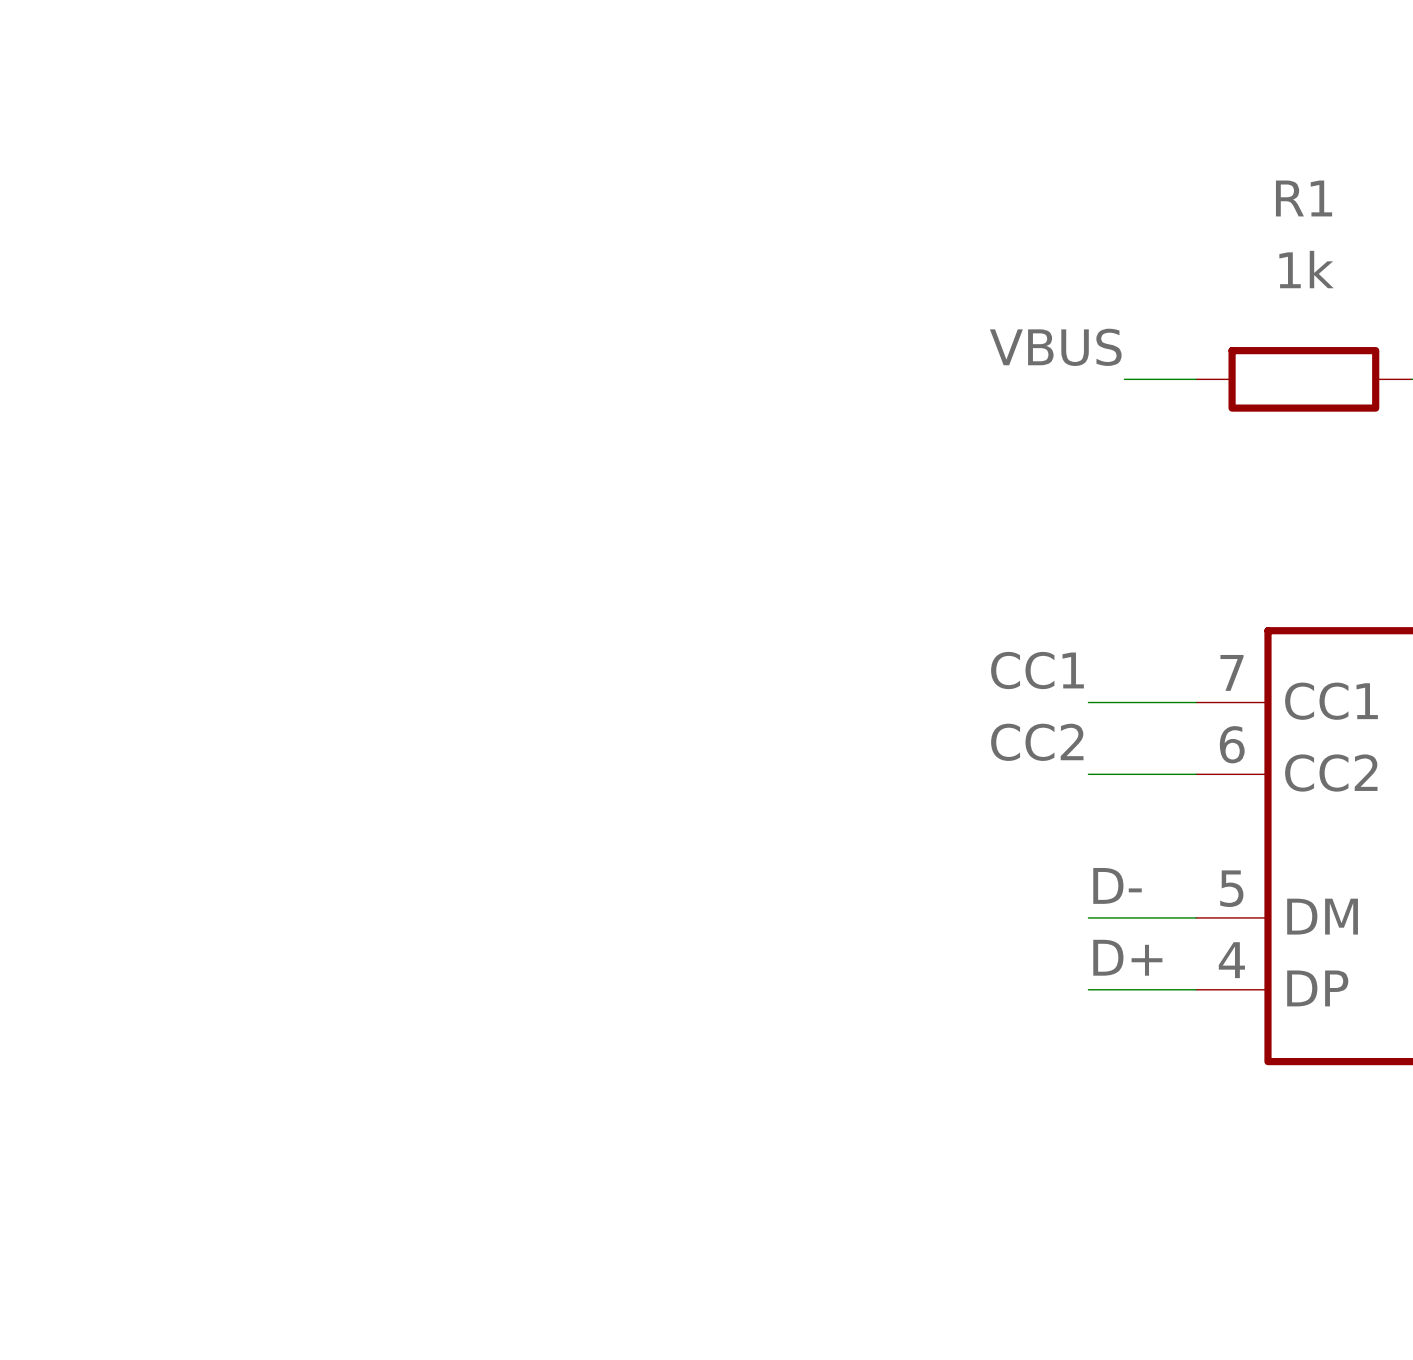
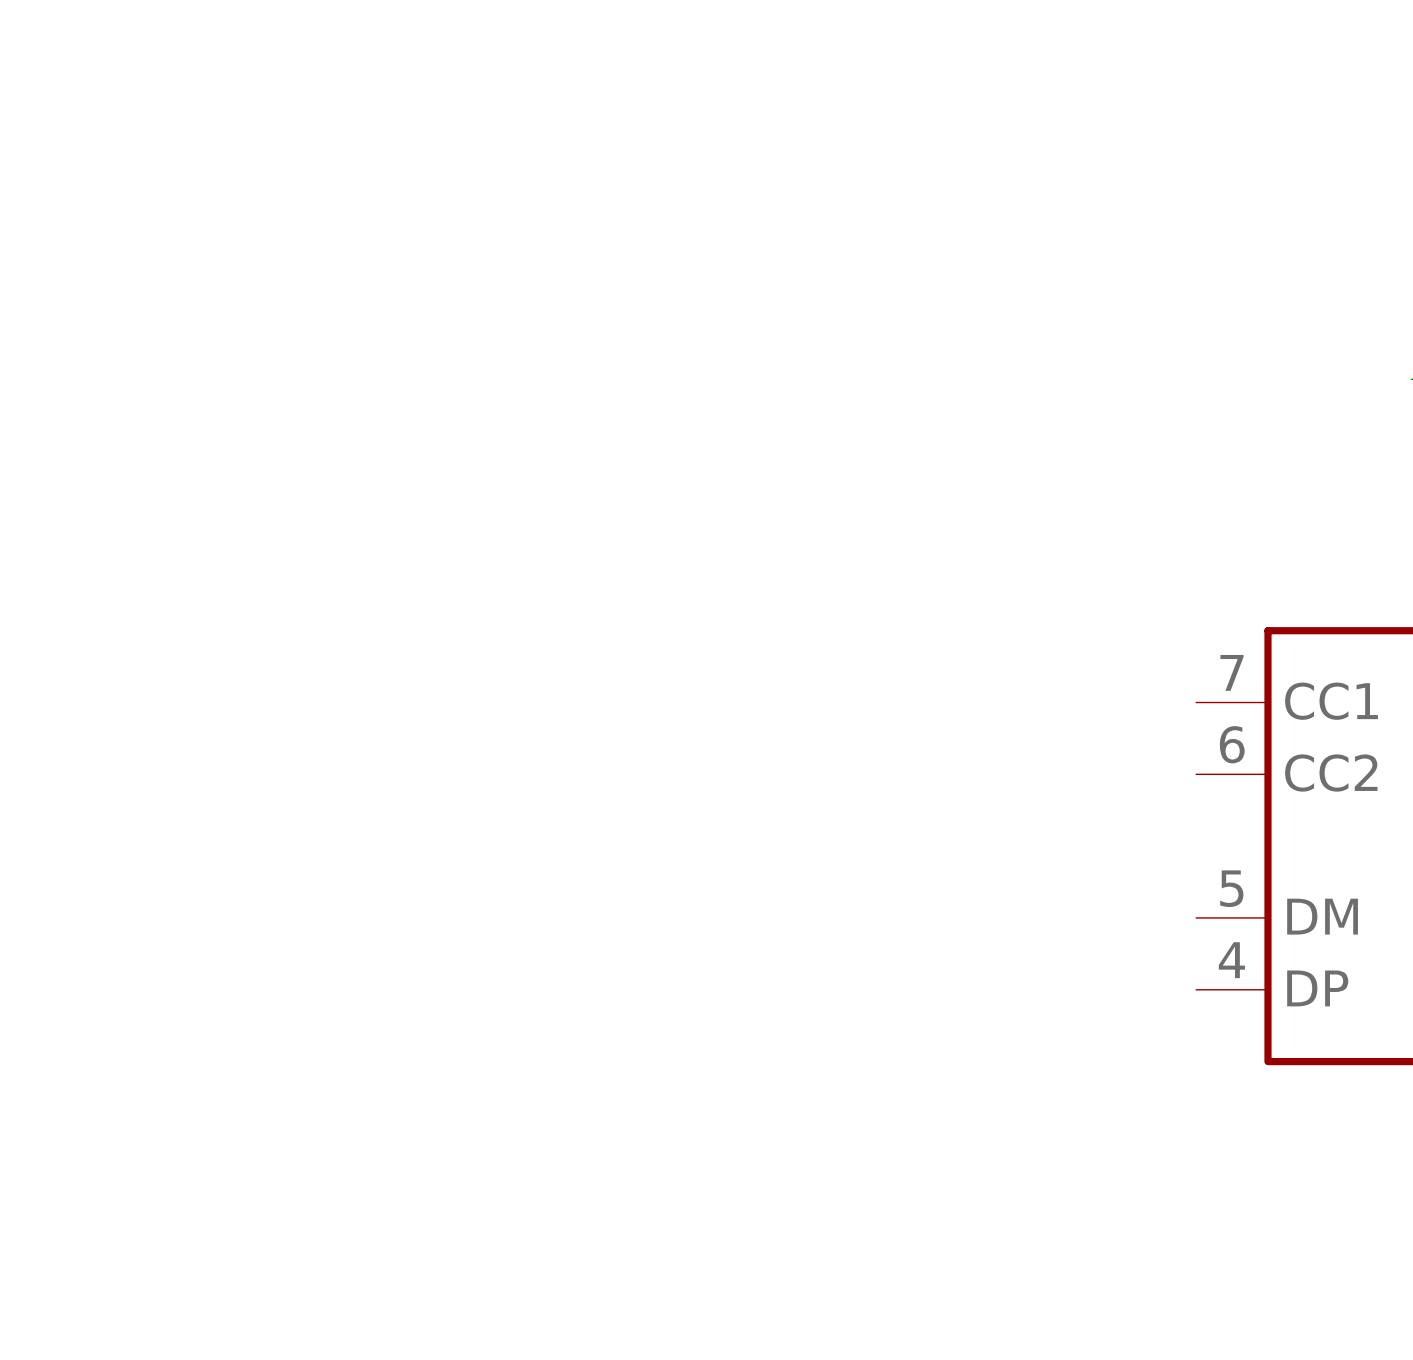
label: VBUS (1055, 347) -> none
wire: (1124, 379) (1196, 379) -> none
R1: 1k (1303, 379) -> none
label: CC1 (1037, 670) -> none
wire: (1088, 702) (1196, 702) -> none
label: CC2 (1037, 742) -> none
wire: (1088, 774) (1196, 774) -> none
label: D- (1117, 885) -> none
wire: (1088, 917) (1196, 917) -> none
label: D+ (1127, 957) -> none
wire: (1088, 989) (1196, 989) -> none

